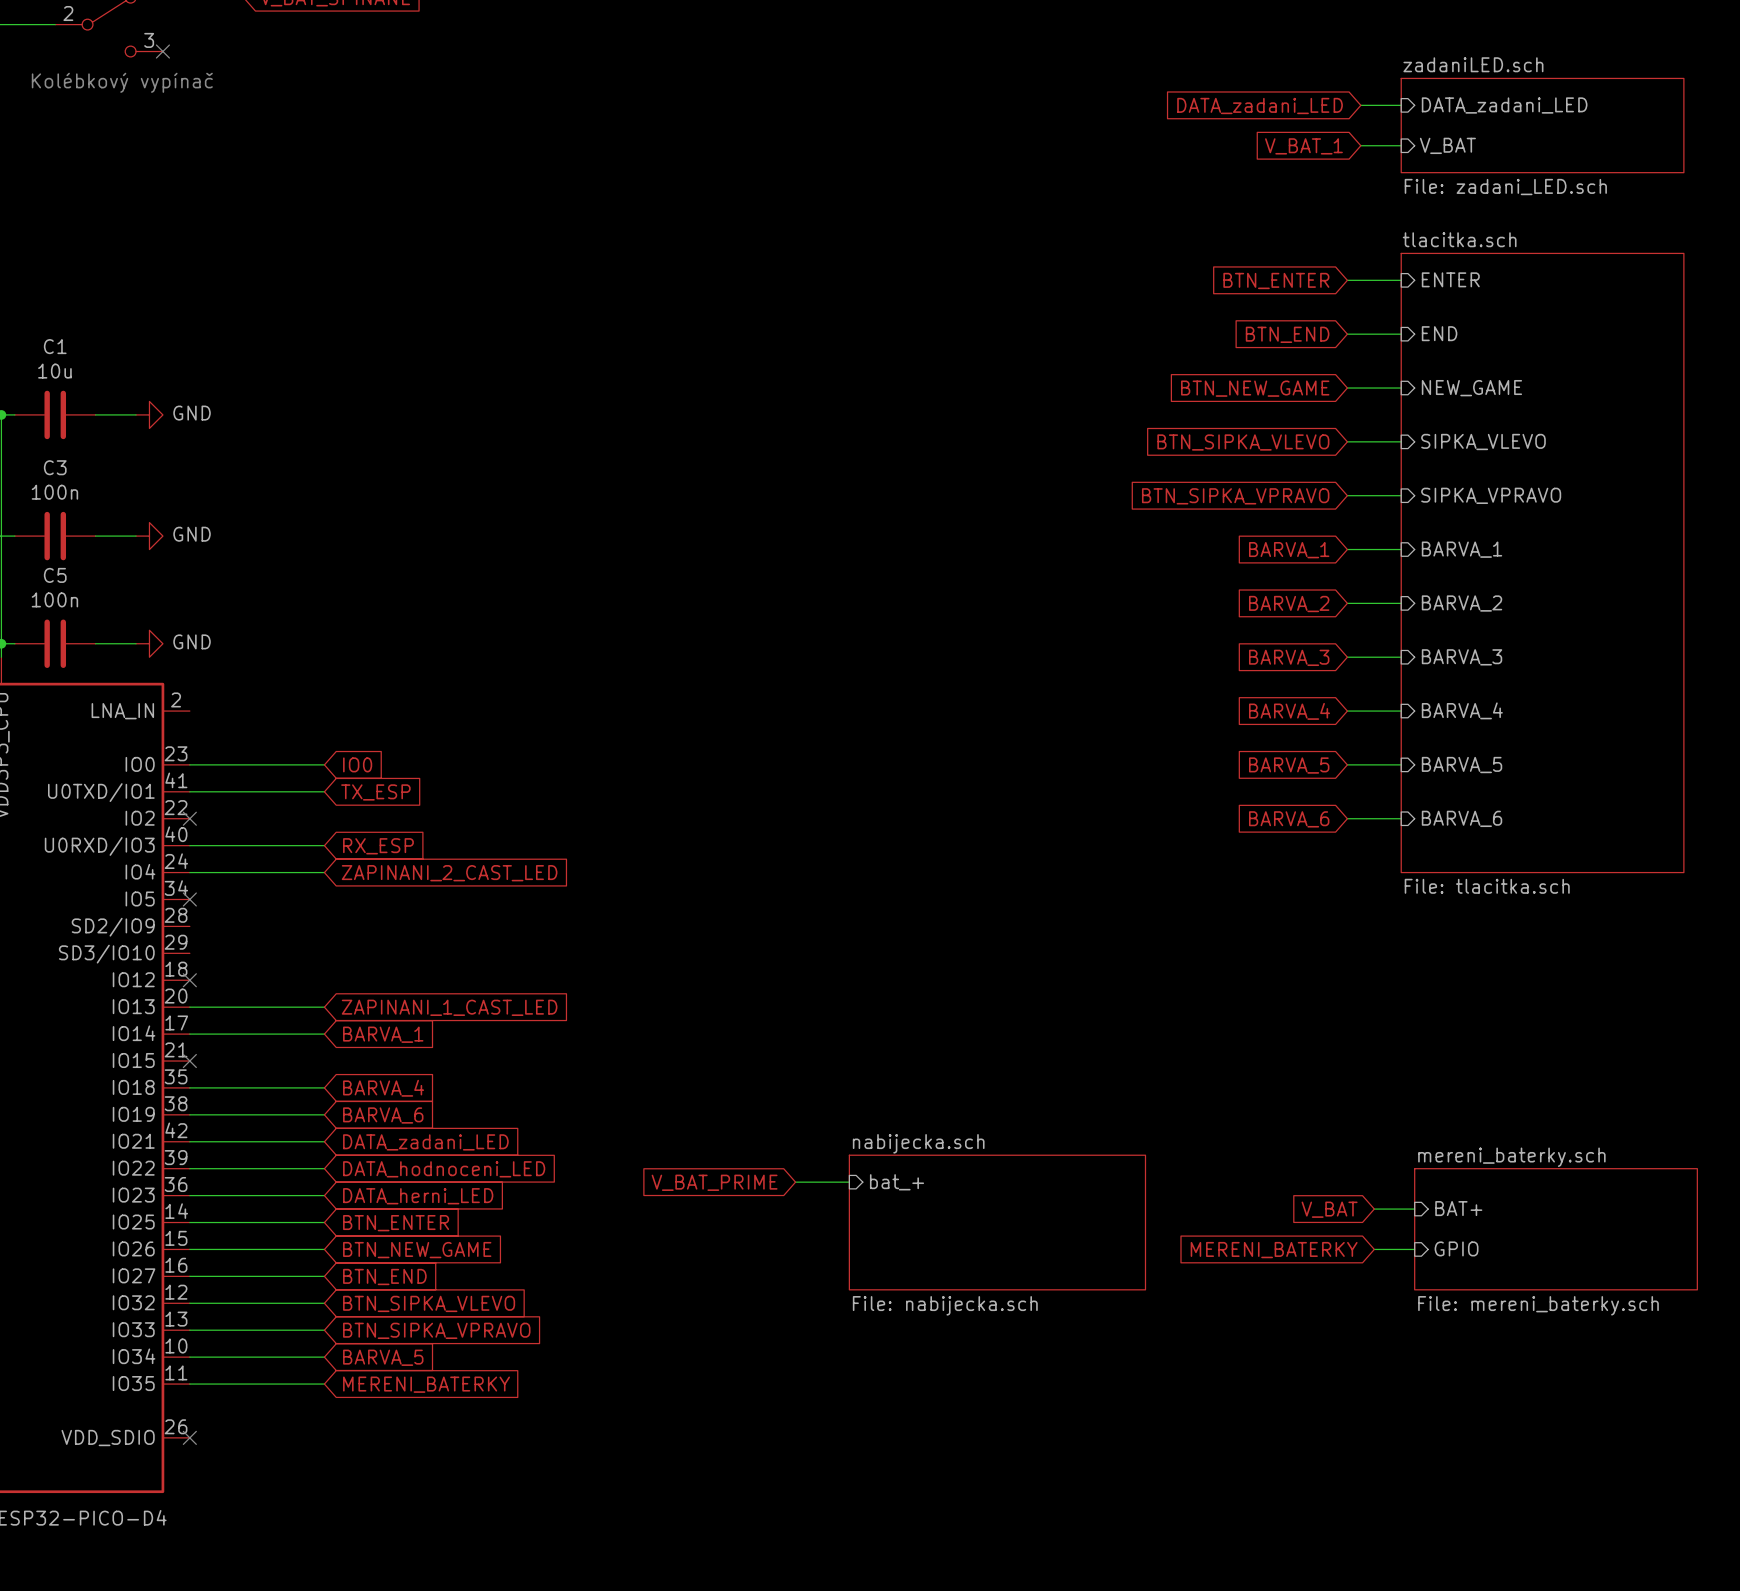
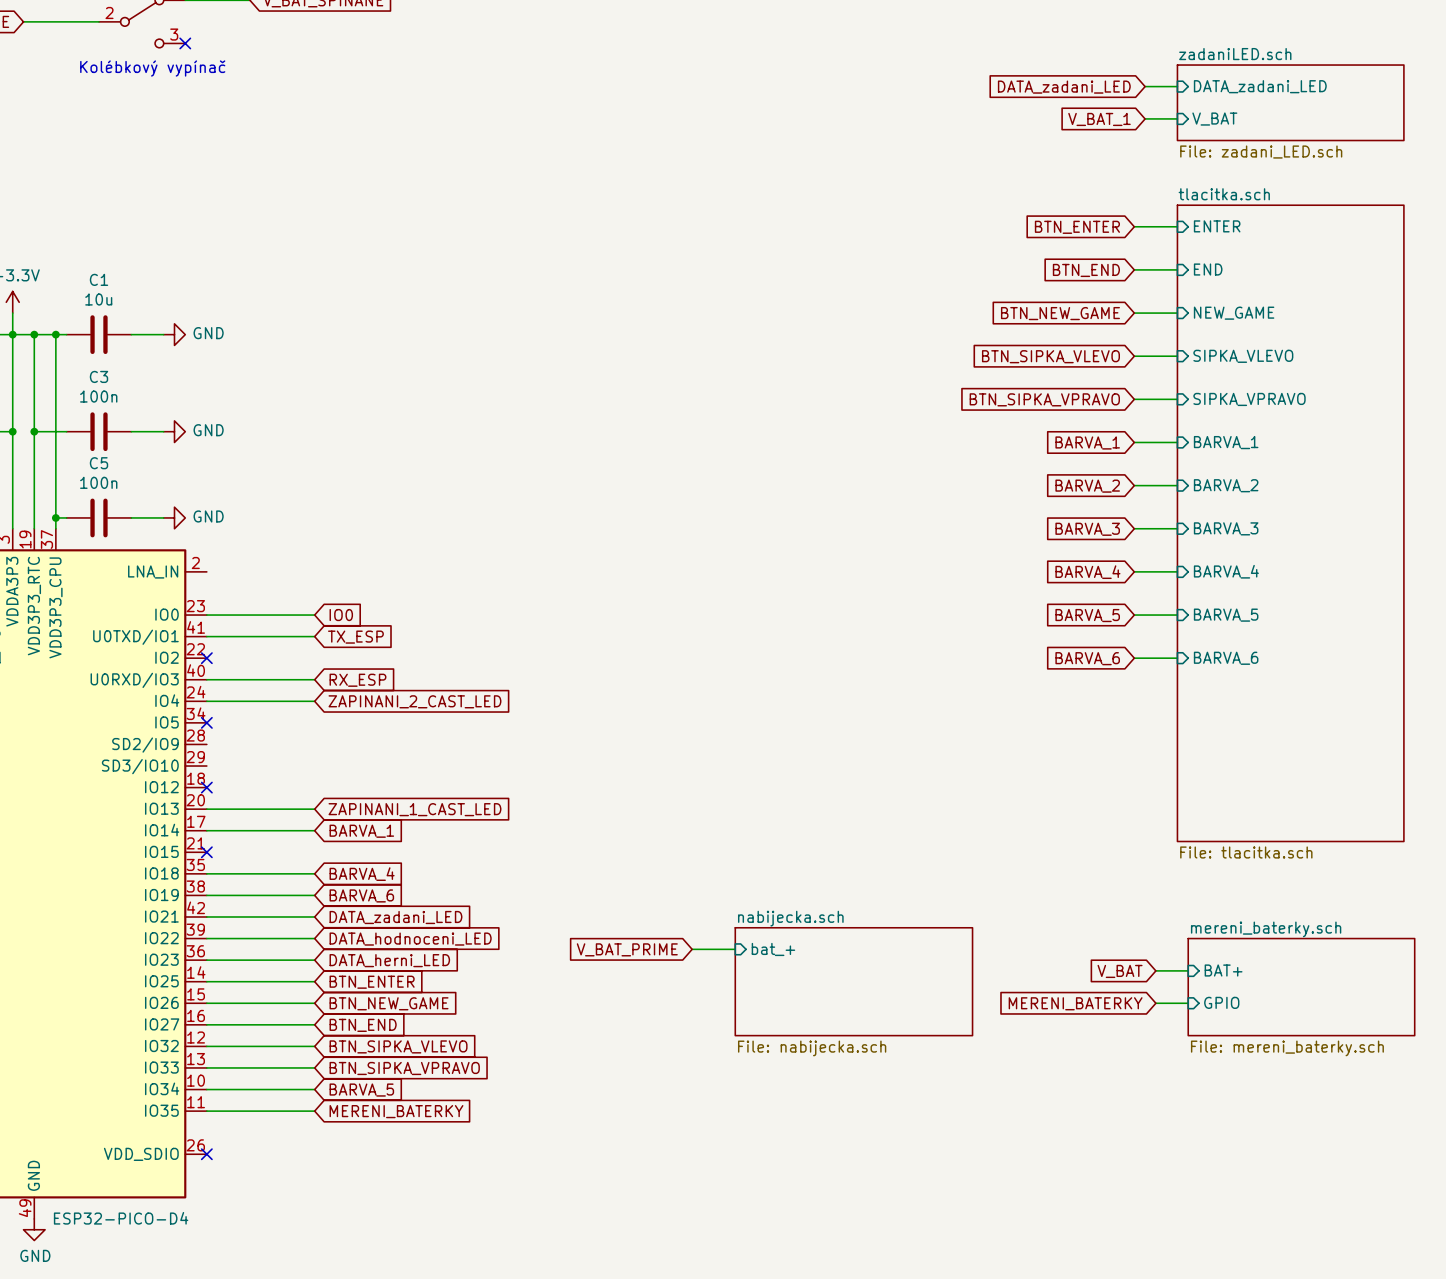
sheet tlacitka.sch: File: tlacitka.sch (1542, 562) -> none
sheet tlacitka.sch: none -> File: tlacitka.sch (1290, 523)

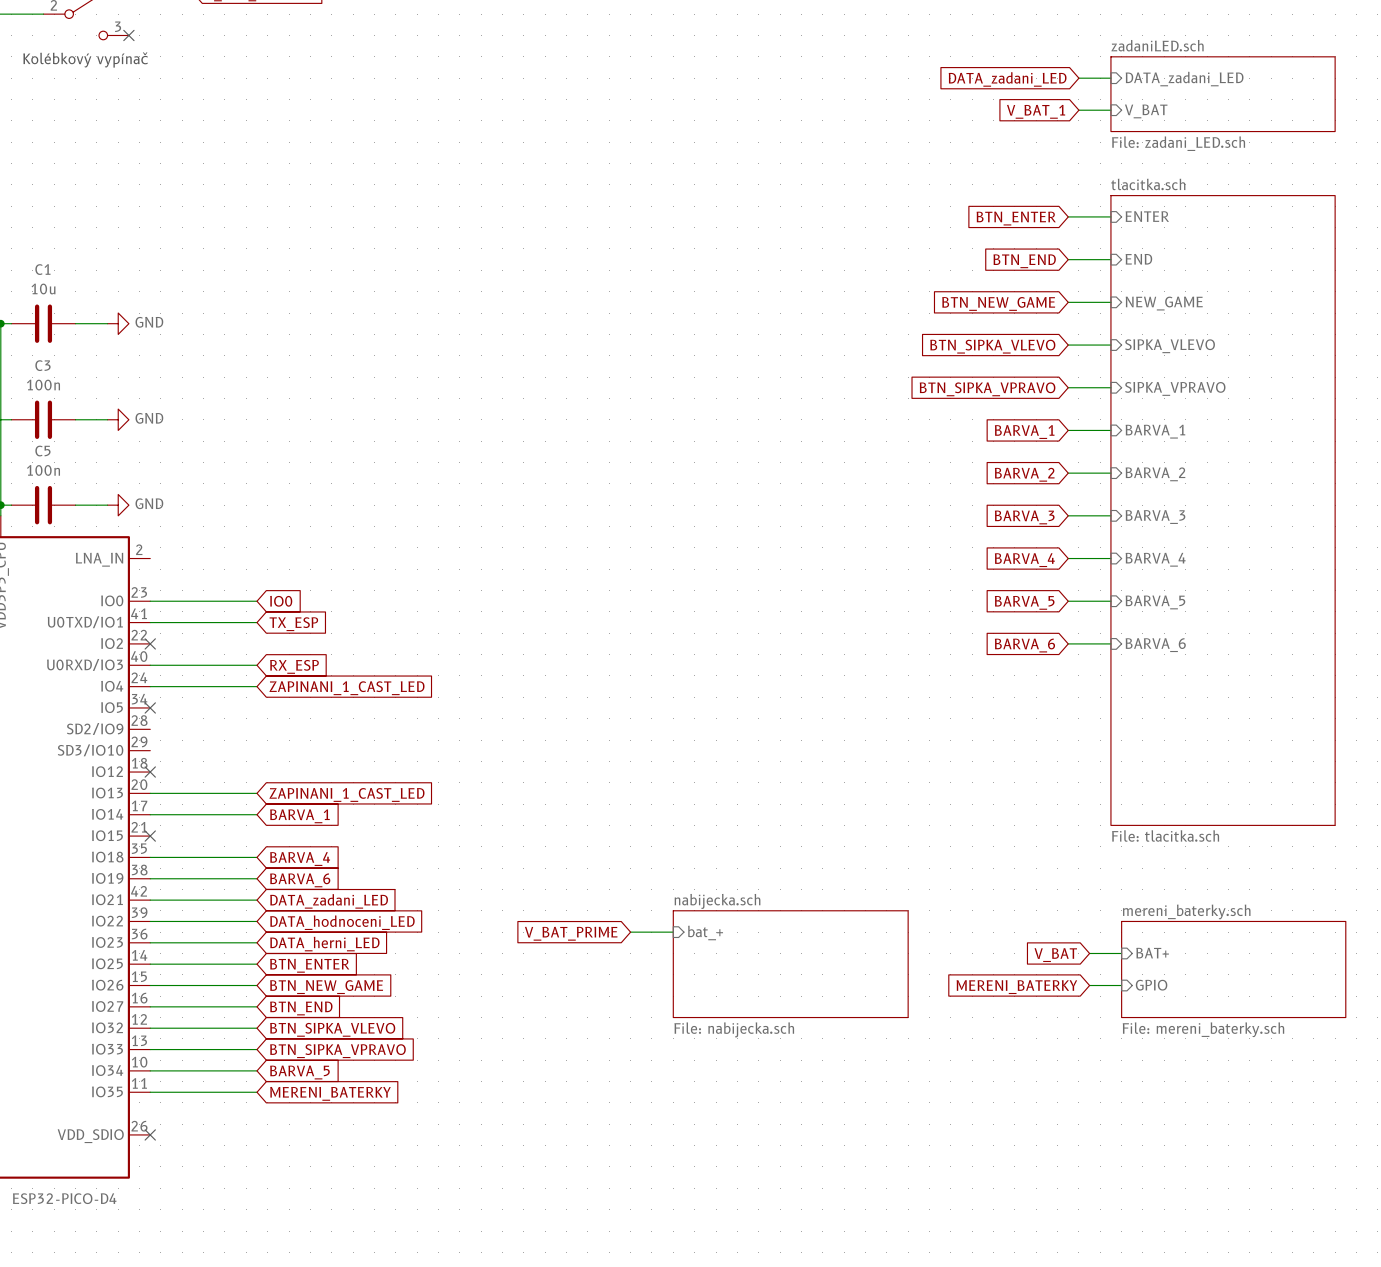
global label: ZAPINANI_2_CAST_LED (414, 701) -> ZAPINANI_1_CAST_LED (346, 688)

